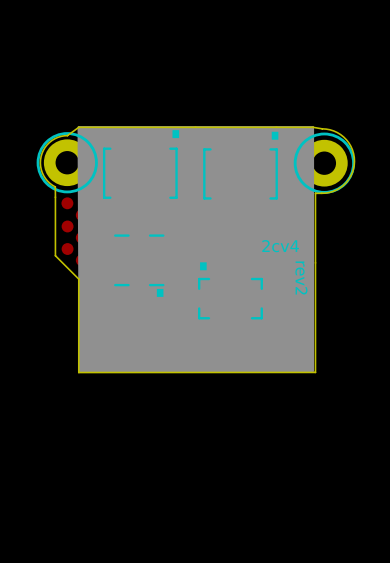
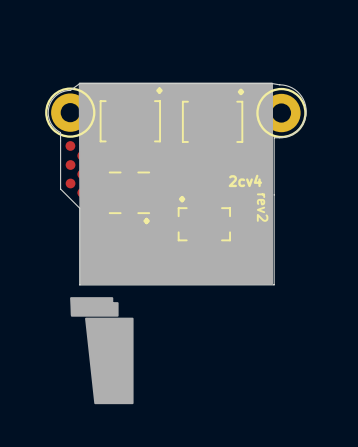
drawing: none -> [70, 297, 134, 405]

